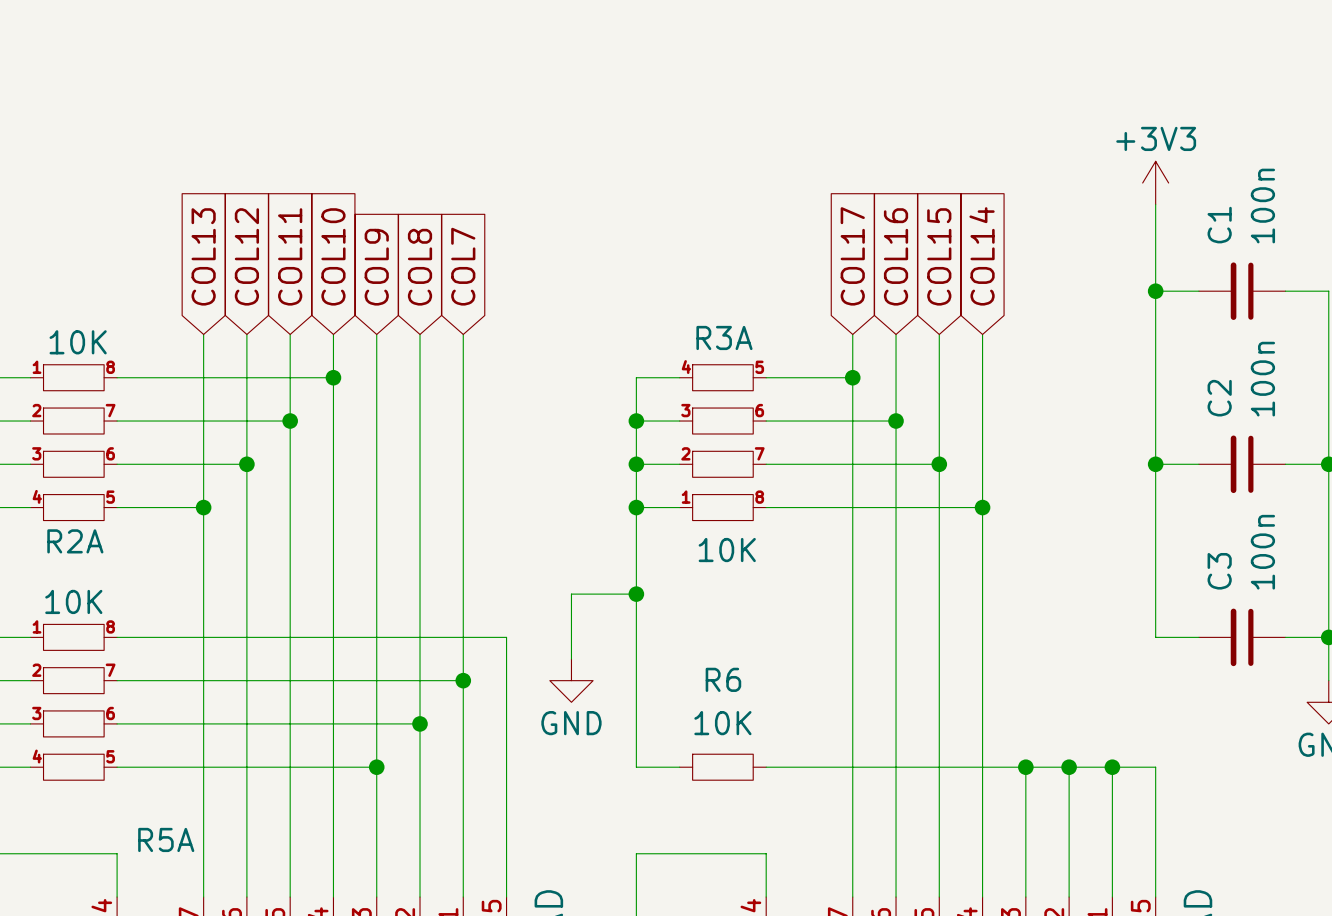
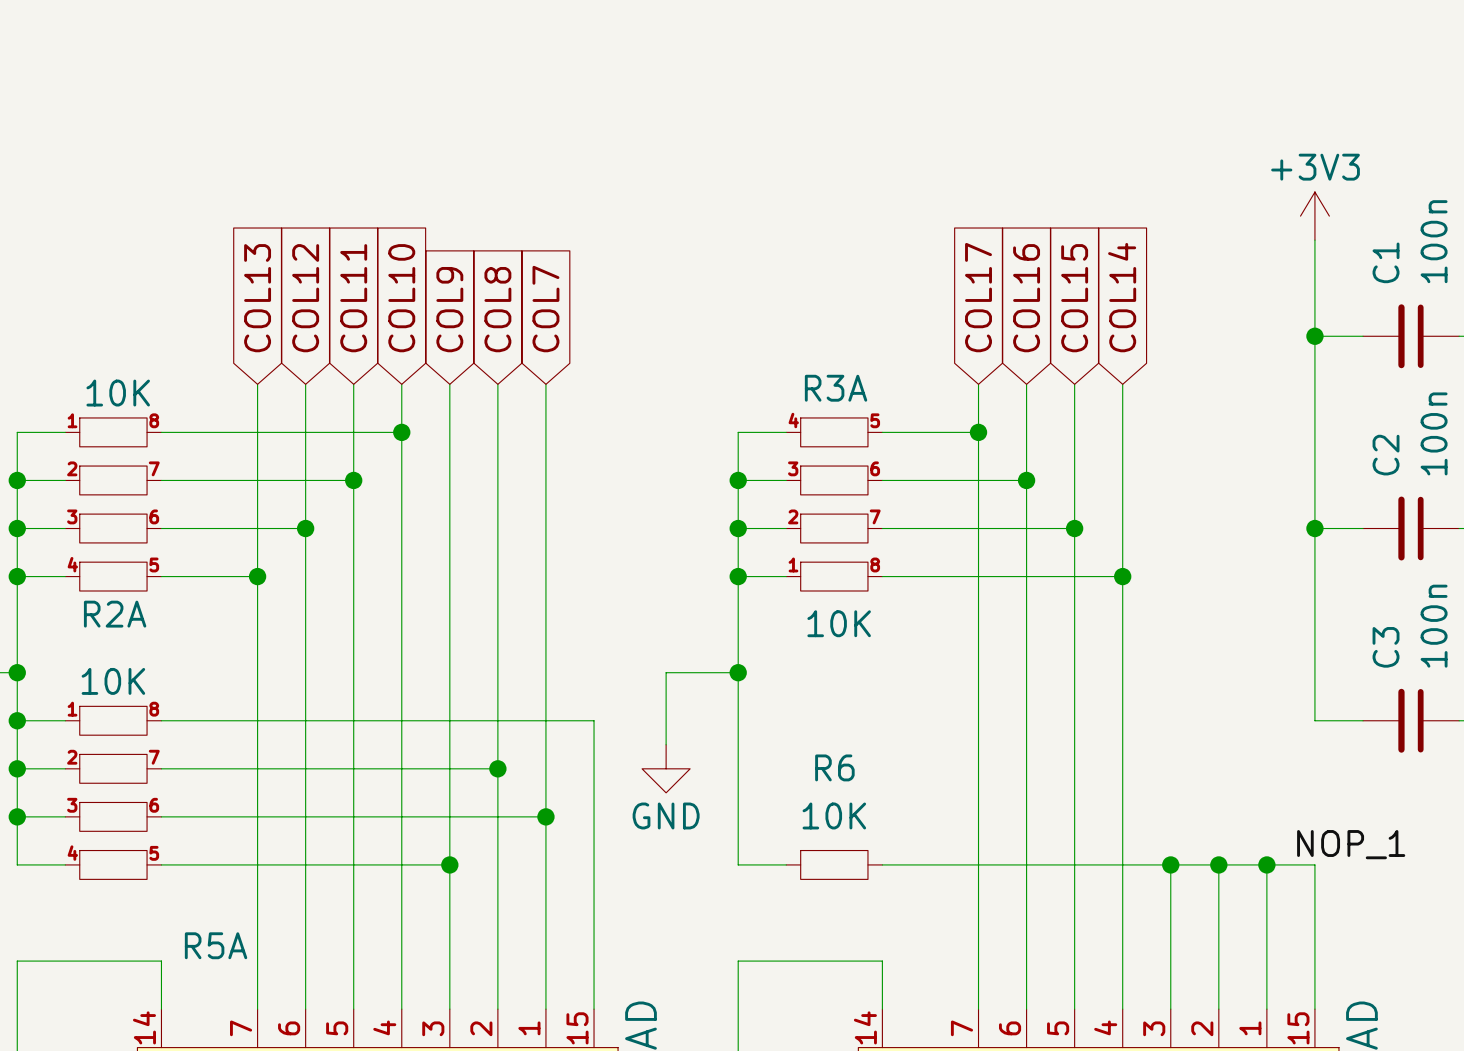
wire: (420, 680) (463, 680) -> (497, 816) (545, 816)
junction: none -> (497, 768)
junction: (463, 680) -> none
junction: (420, 723) -> none
junction: none -> (545, 816)
label: none -> NOP_1 (1351, 844)

